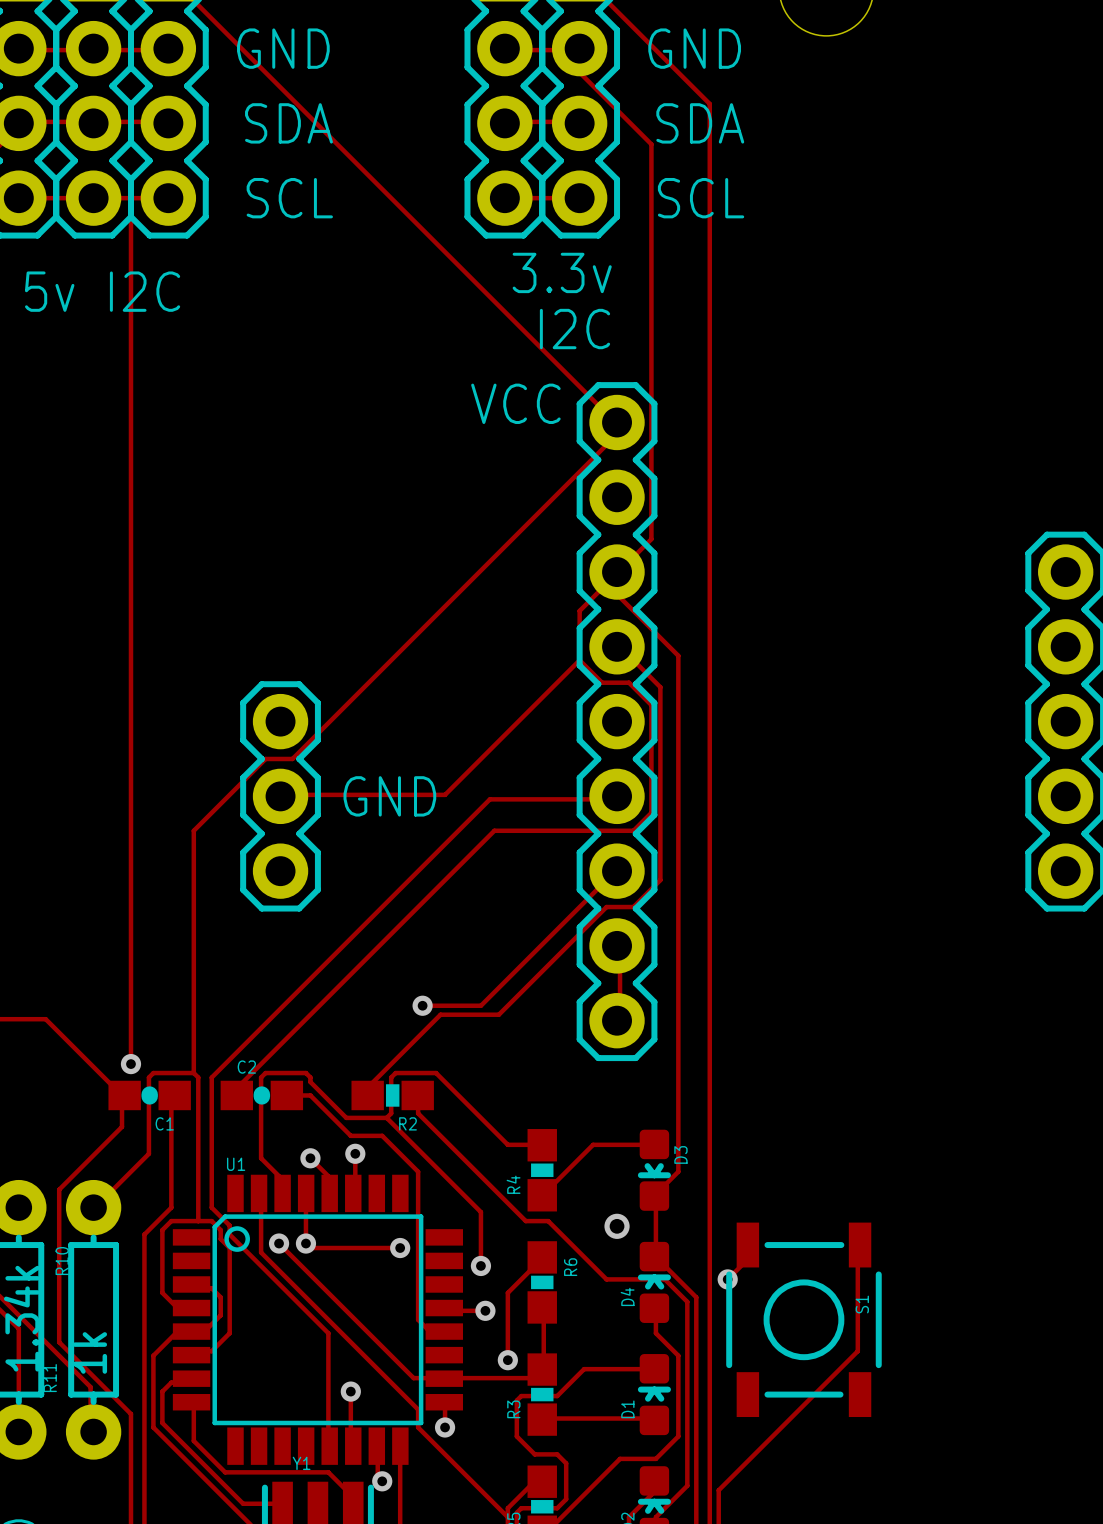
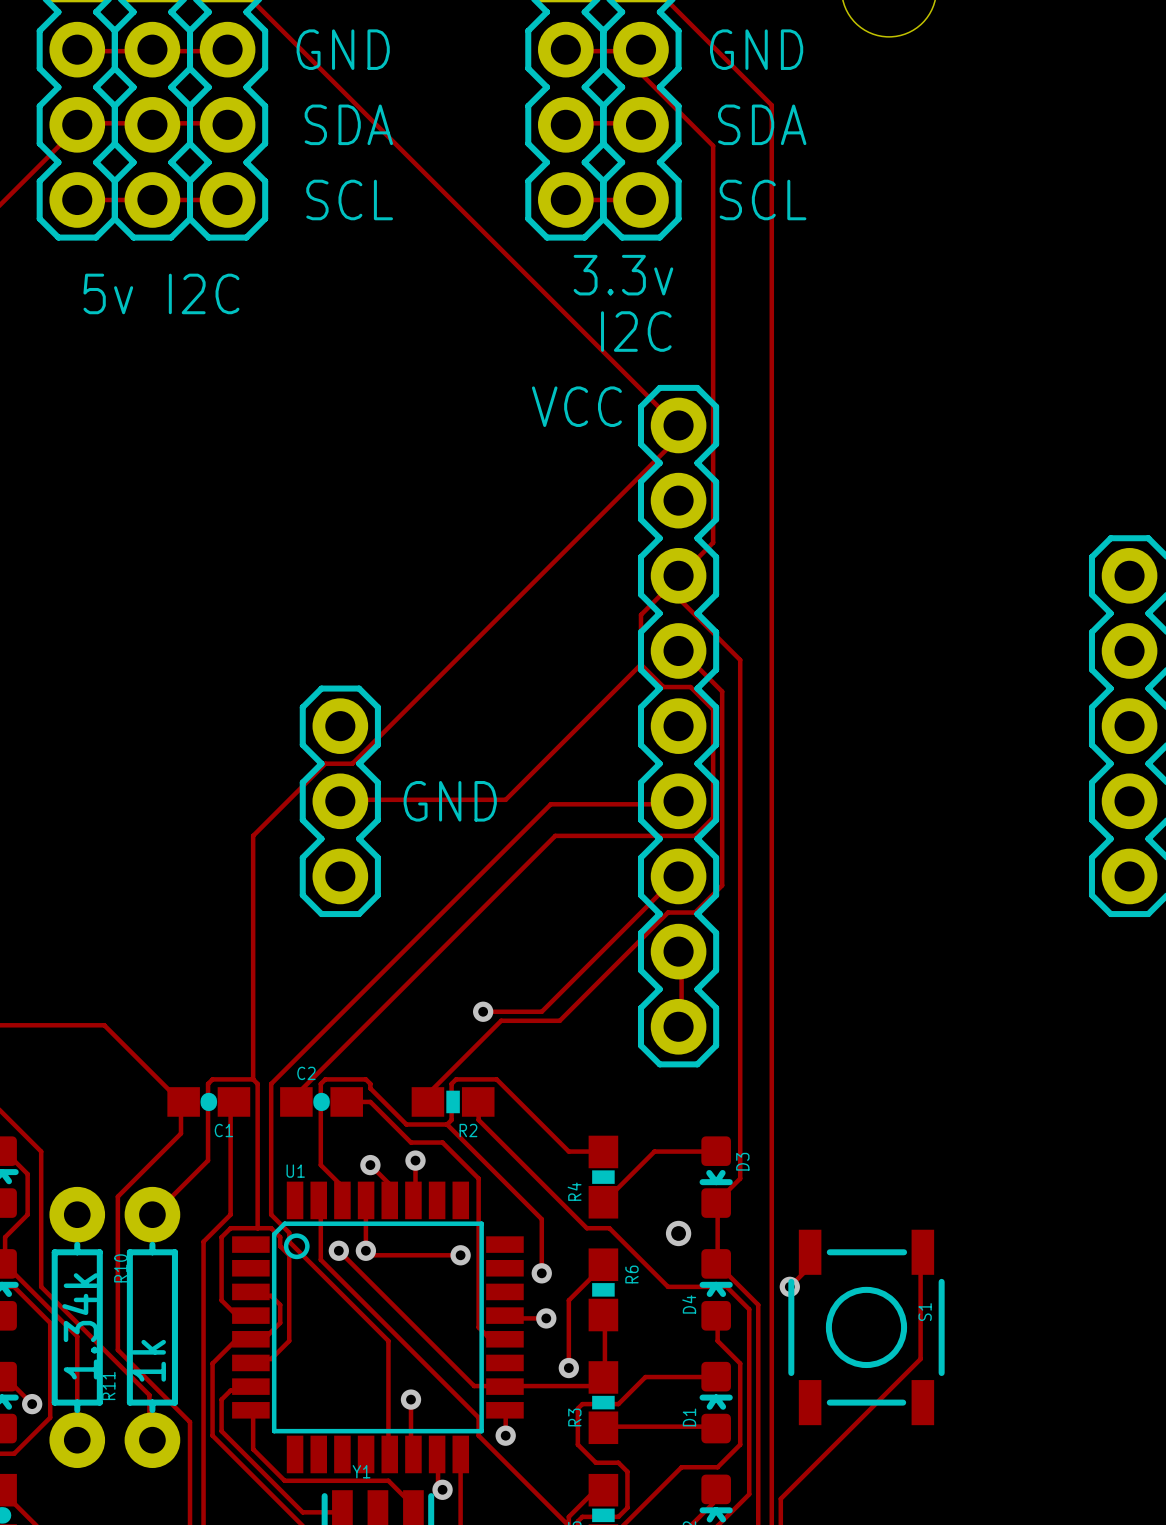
track: (130, 198) (130, 1064) -> none
via: (130, 1064) -> none

